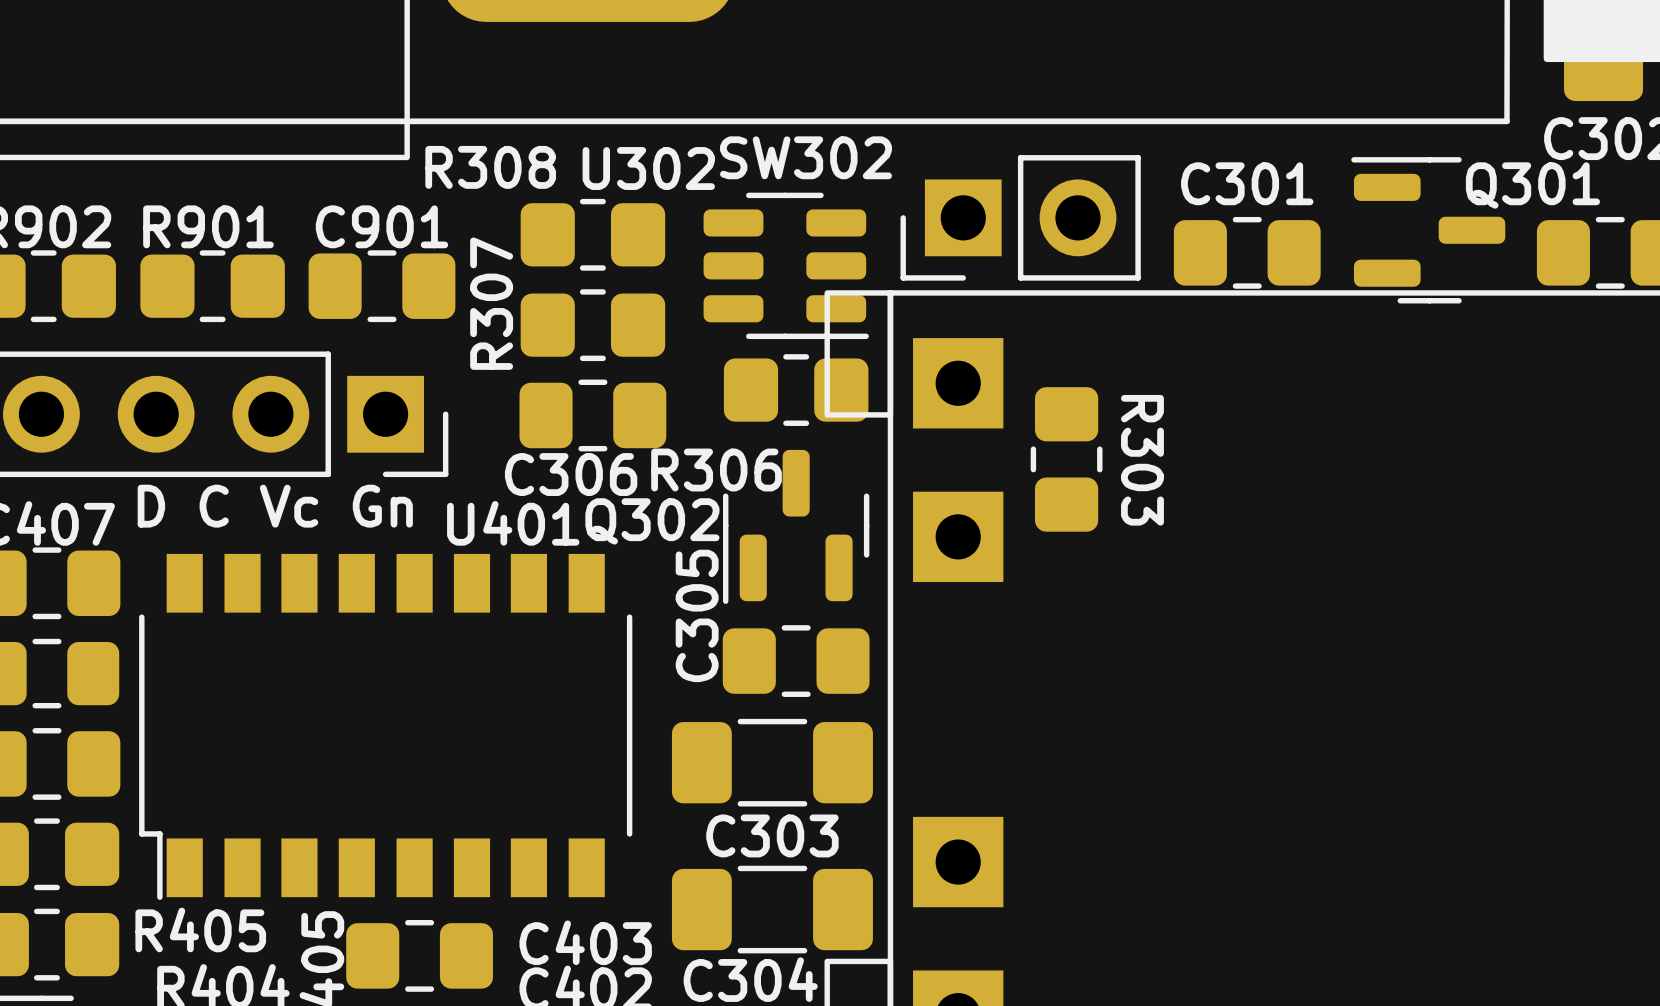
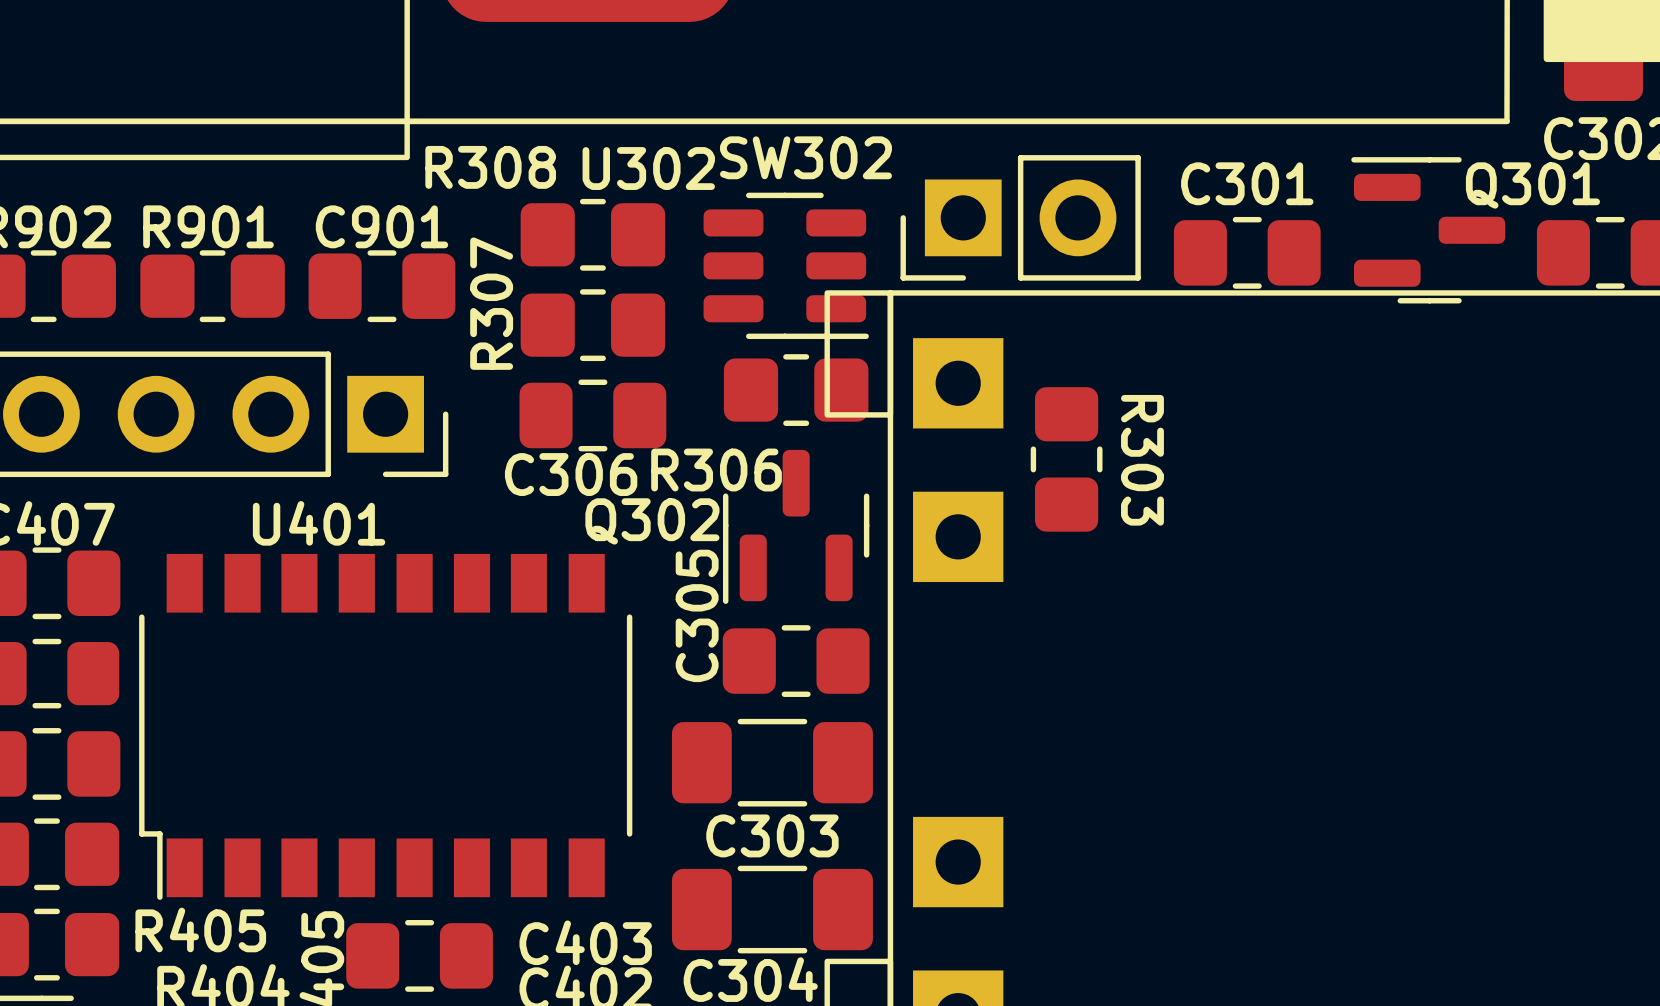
text: D C Vc Gn (275, 506) -> none
U401 name position: U401 (513, 523) -> U401 (319, 523)

